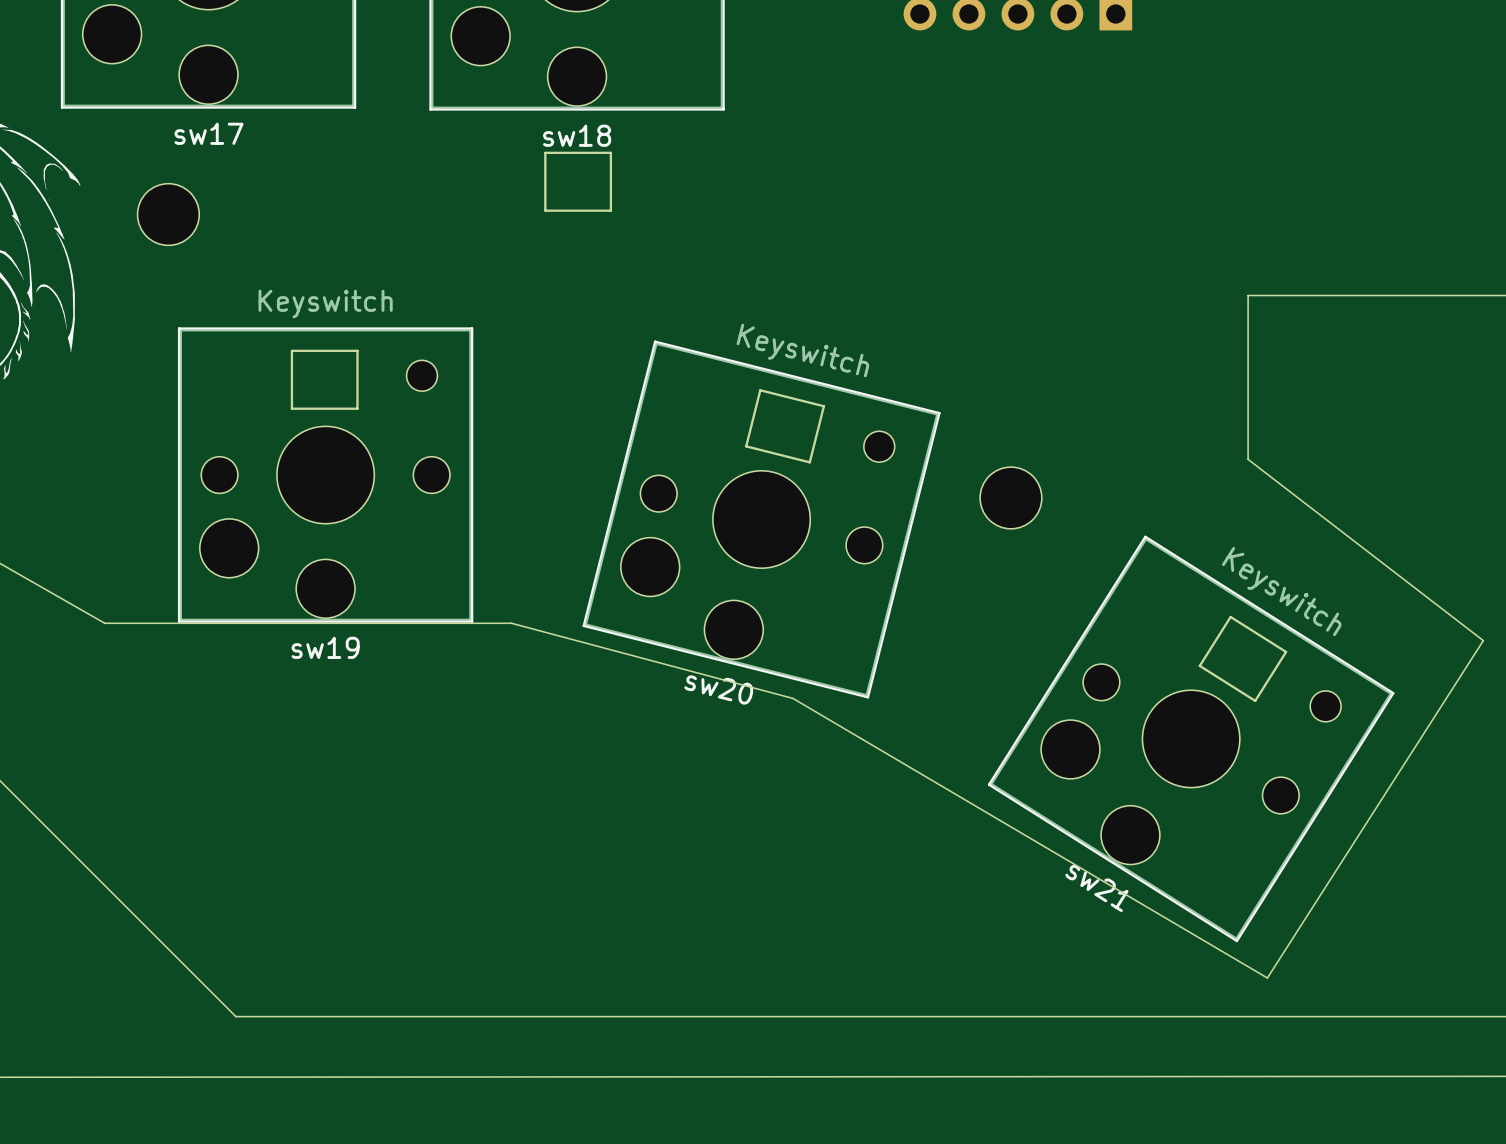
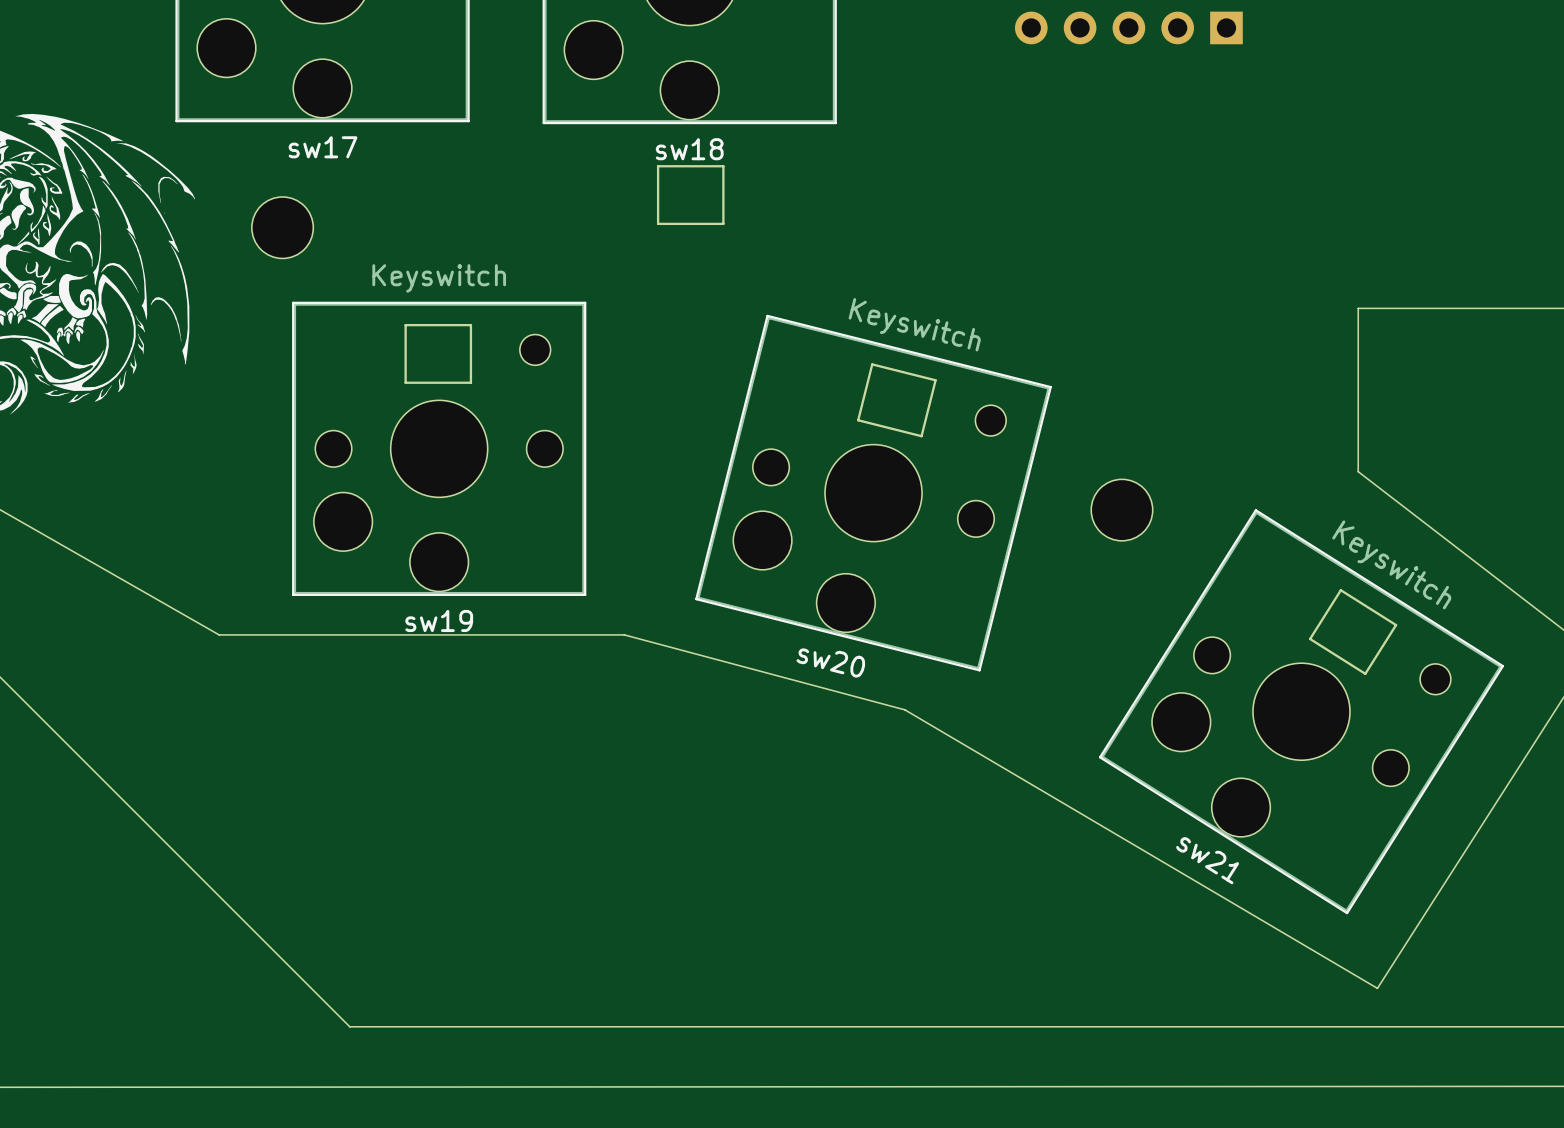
part position: (324, 379) -> (438, 353)
part position: (785, 426) -> (896, 400)
sw19 position: (325, 475) -> (439, 448)
sw20 position: (761, 519) -> (873, 493)
part position: (1242, 658) -> (1353, 632)
sw21 position: (1191, 738) -> (1301, 711)

